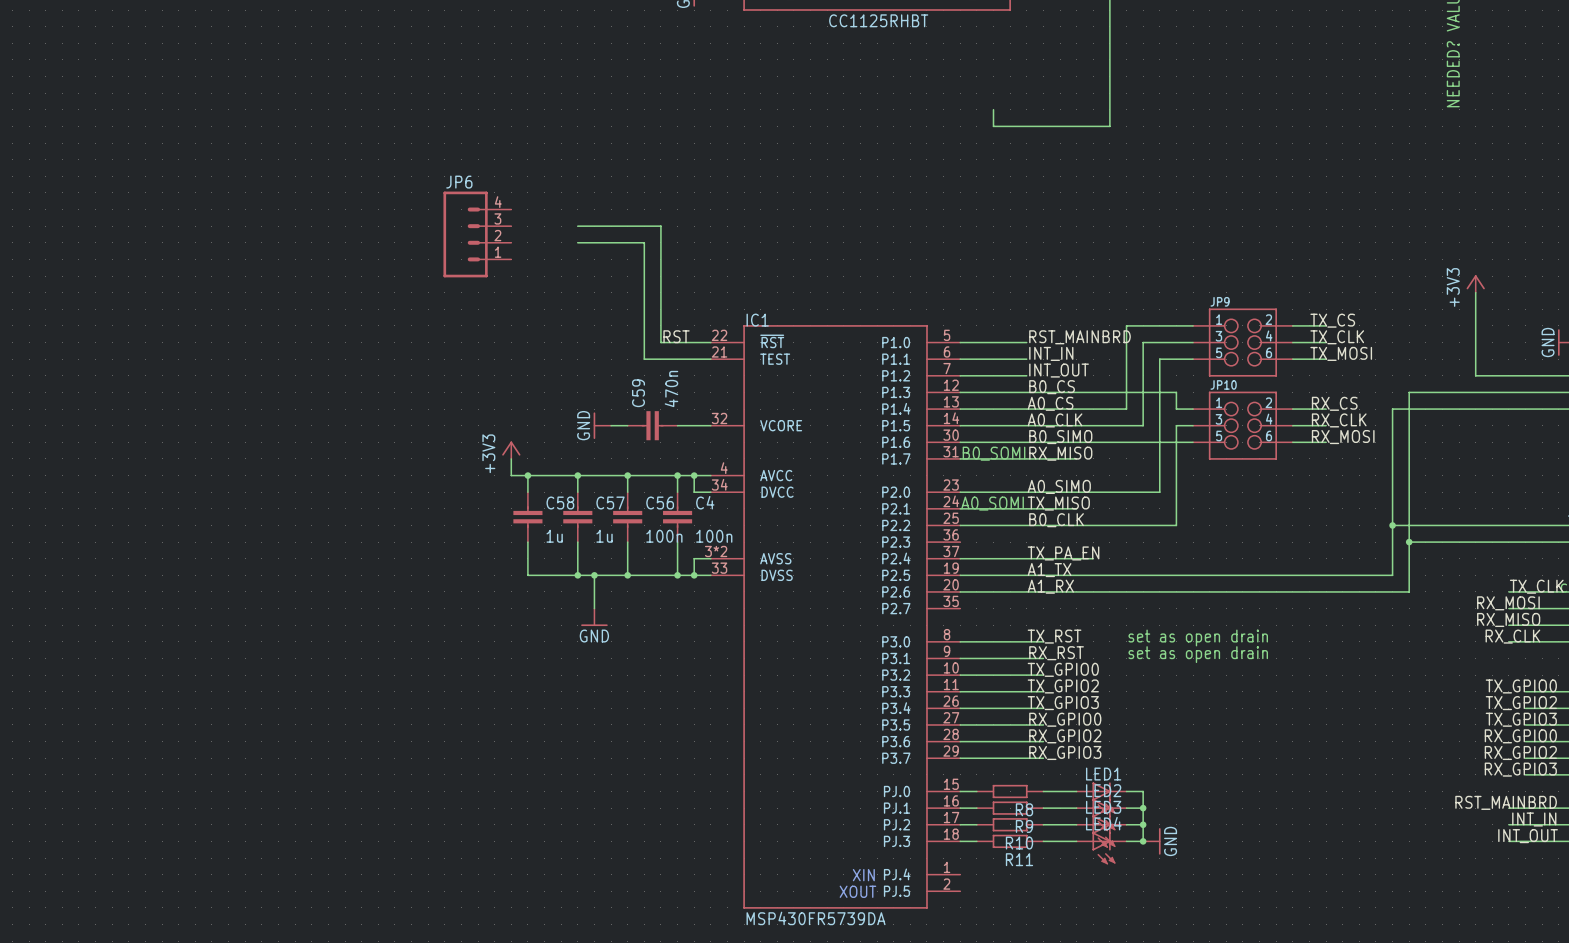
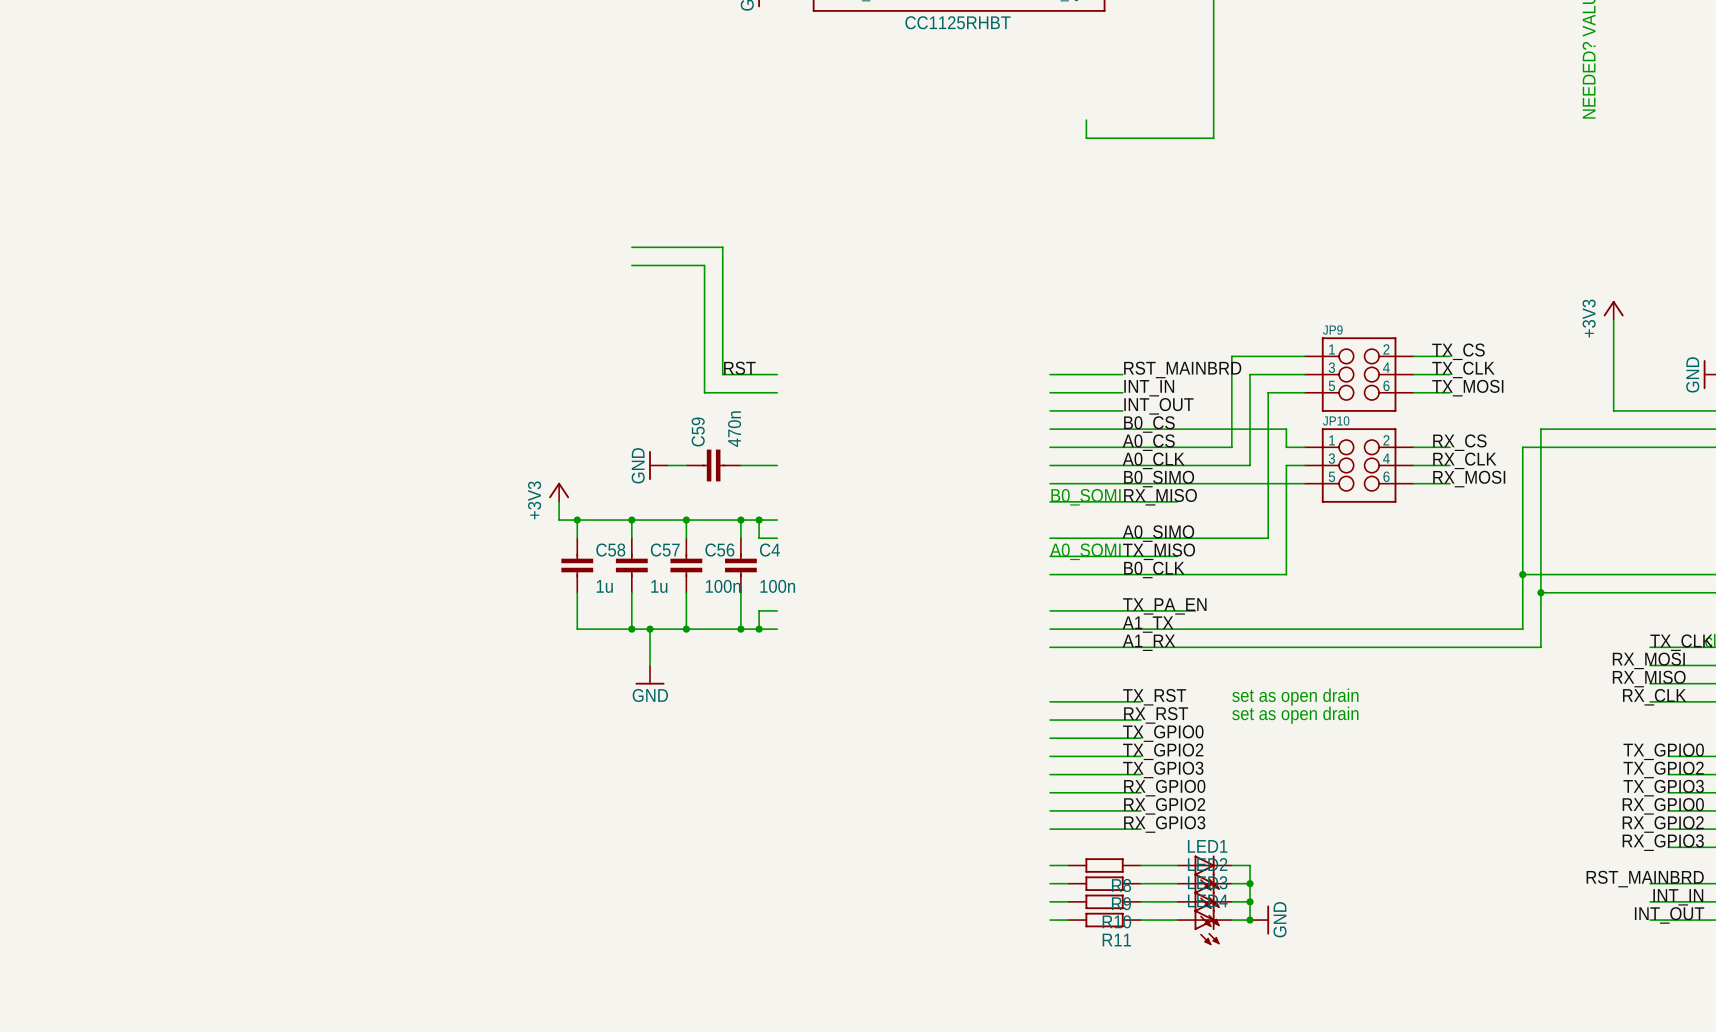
JP6: (477, 234) -> none
IC1: MSP430FR5739DA (835, 616) -> none

